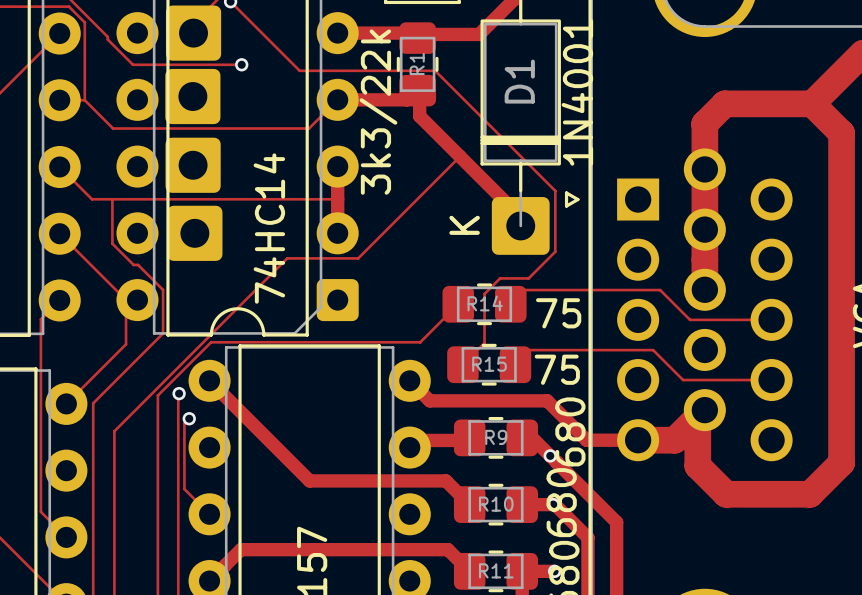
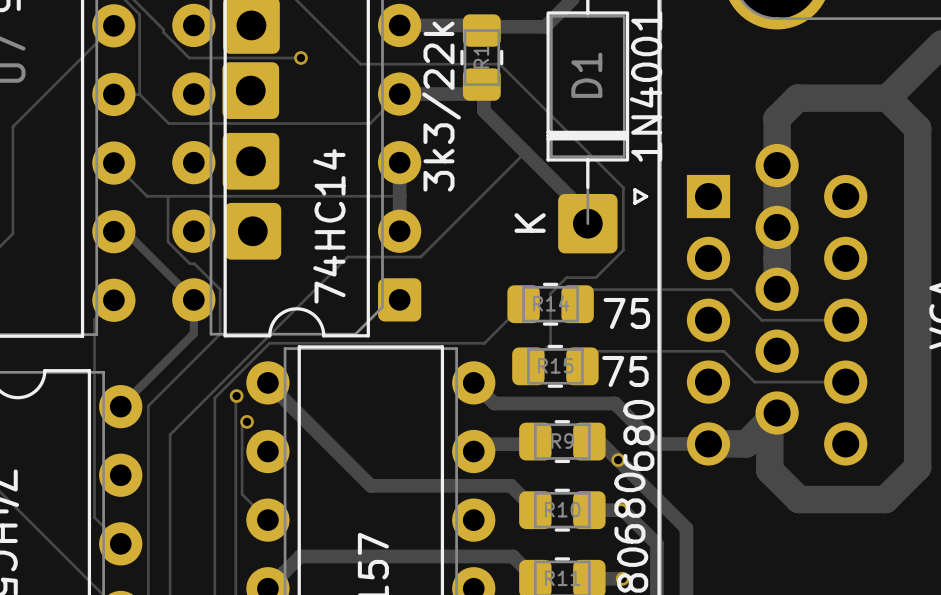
track: (59, 233) (126, 300) -> (113, 231) (125, 231) (193, 299) (193, 333) (182, 345)
track: (126, 300) (126, 344) -> none
track width: thin (126, 344) (66, 403) -> thick (182, 345) (120, 406)

